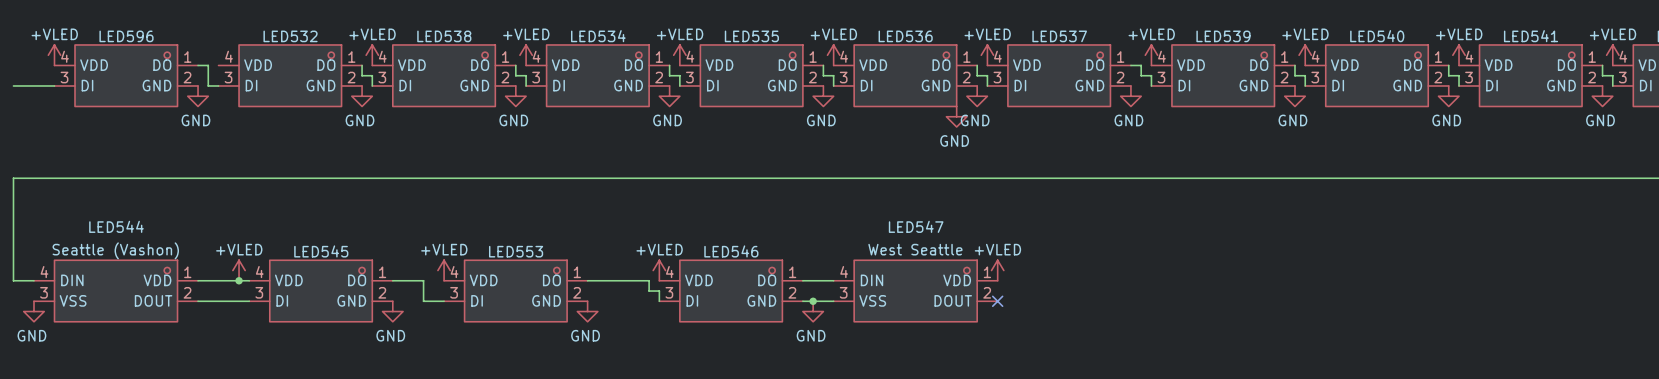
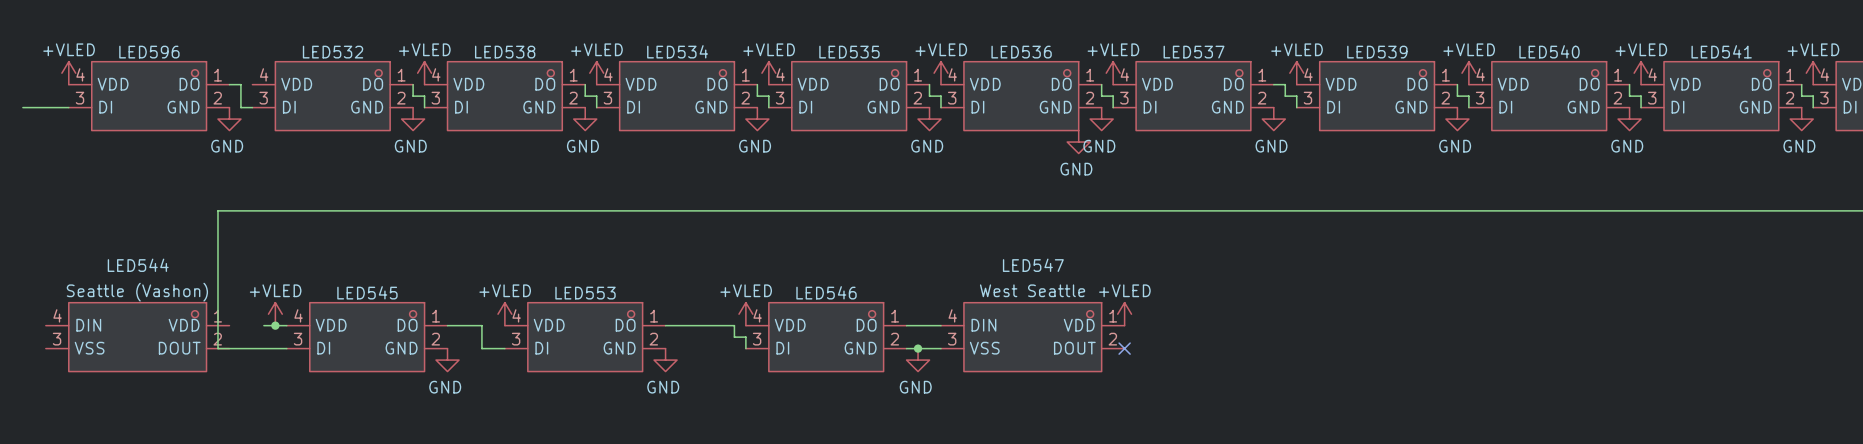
wire: (187, 178) (13, 178) (13, 280) (33, 280) -> (217, 210) (217, 348) (229, 348)
wire: (198, 280) (228, 280) -> none
power symbol: GND (33, 311) -> none

